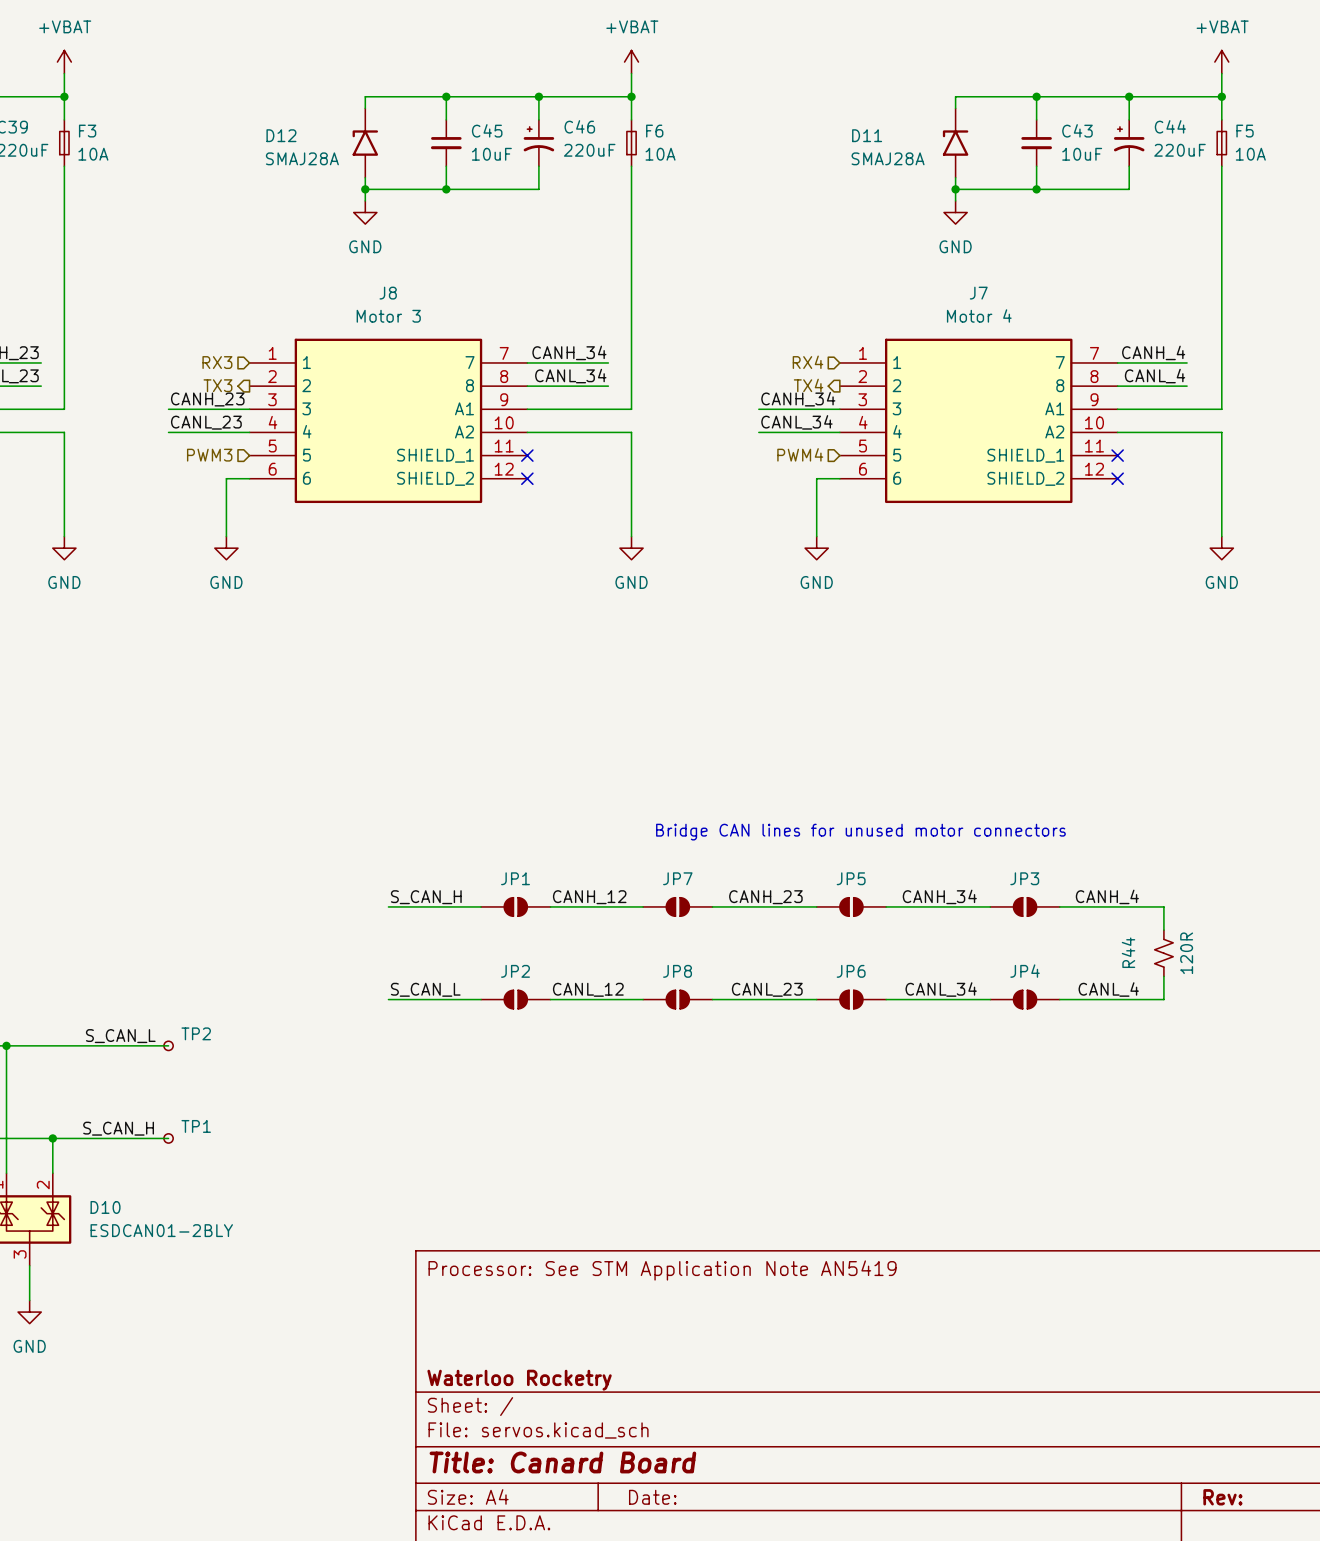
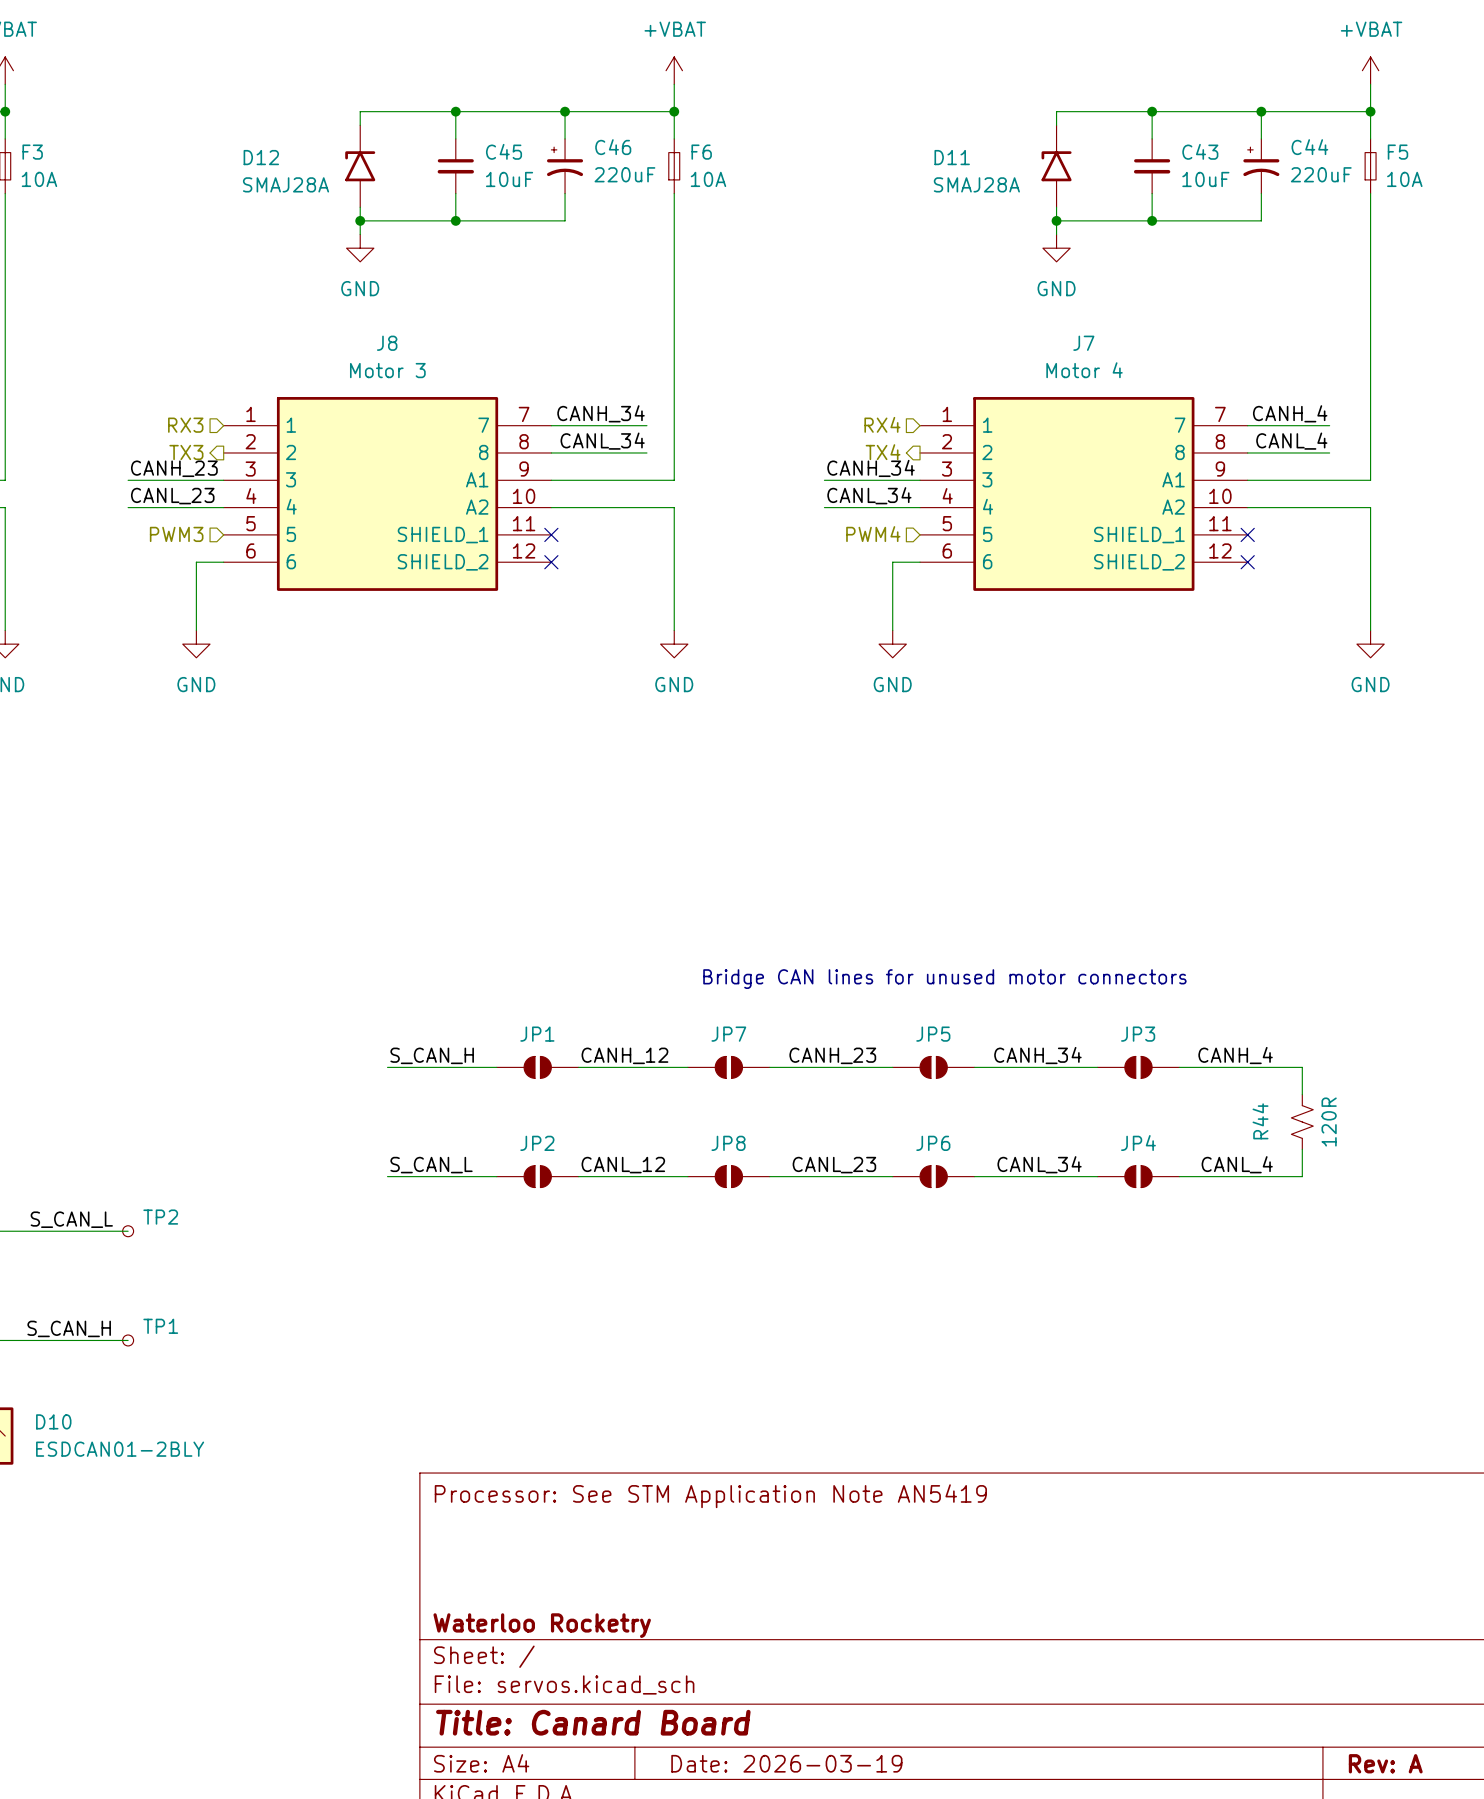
title block: Date: (652, 1497) -> Date: 2026-03-19 (786, 1763)
title block: Rev: (1222, 1497) -> Rev: A (1385, 1763)

